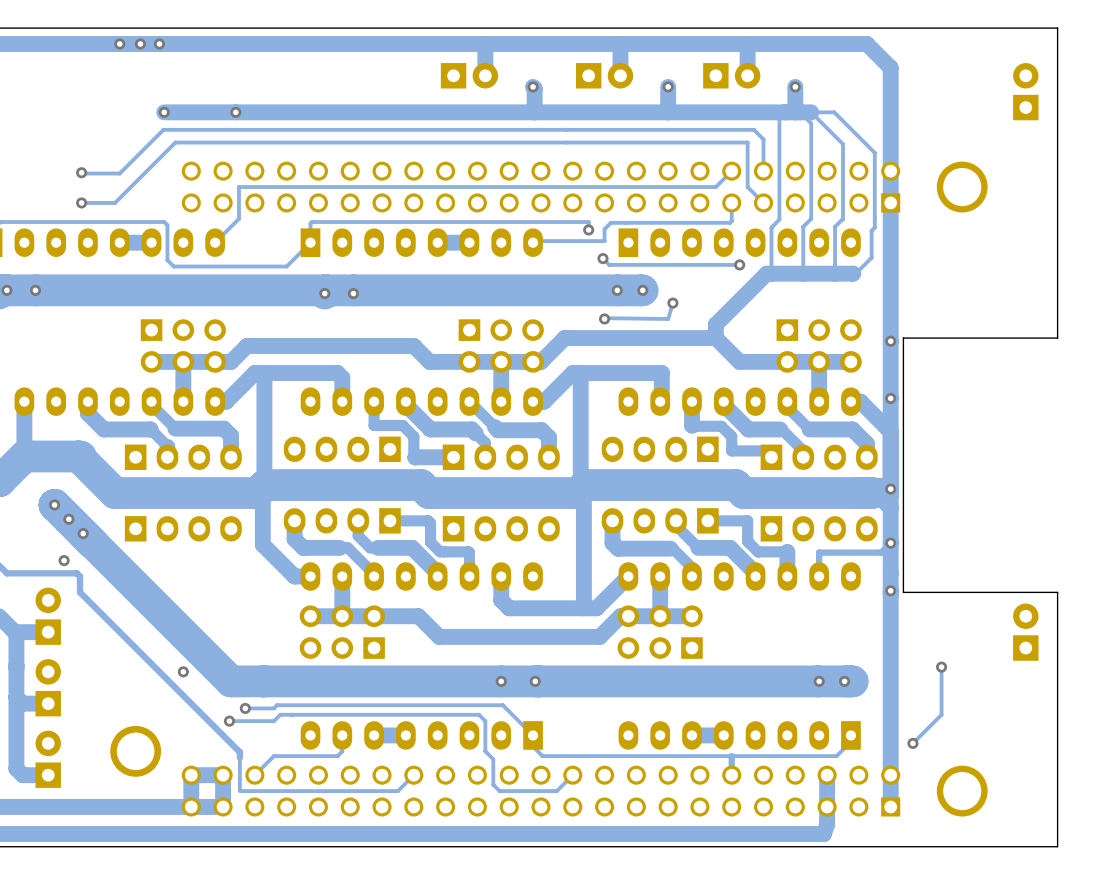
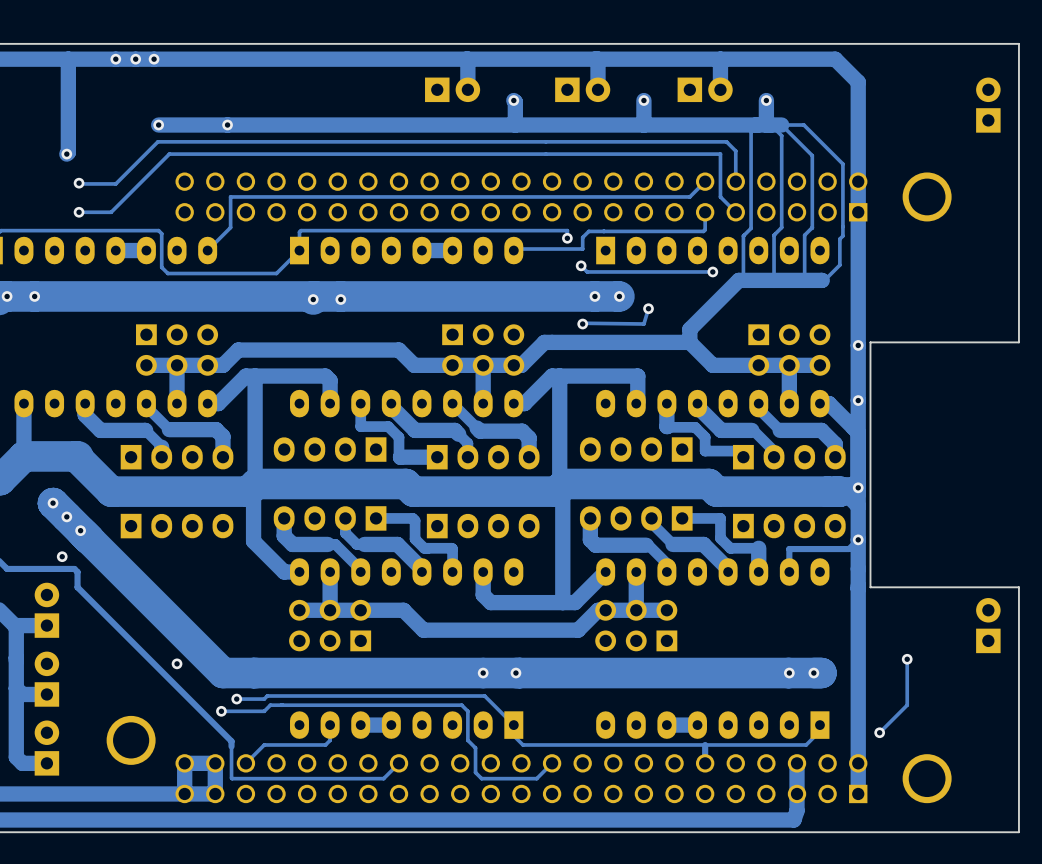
track: none -> (68, 59) (68, 152) (66, 154)
via: none -> (66, 154)
via: (890, 590) -> none

